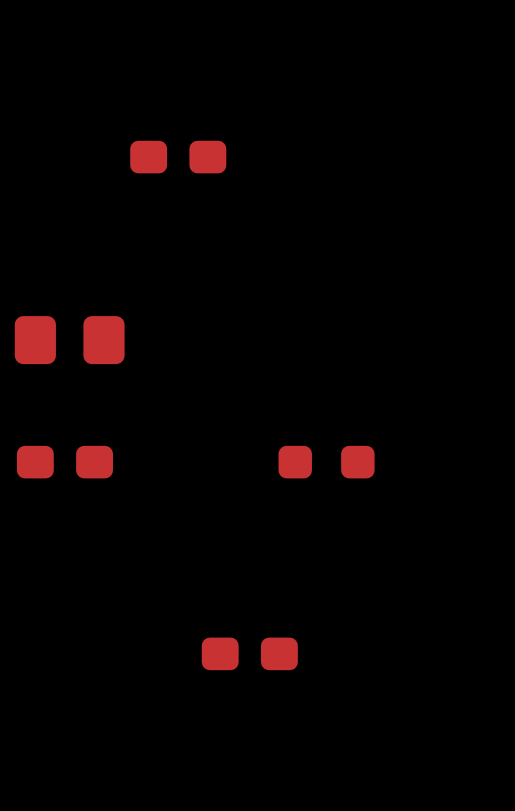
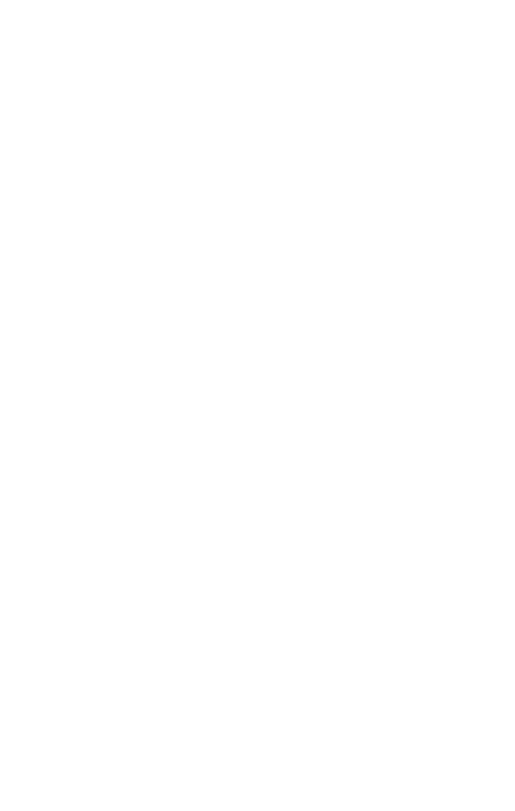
part: (178, 157) -> none
part: (69, 340) -> none
part: (64, 462) -> none
part: (326, 462) -> none
part: (249, 653) -> none

